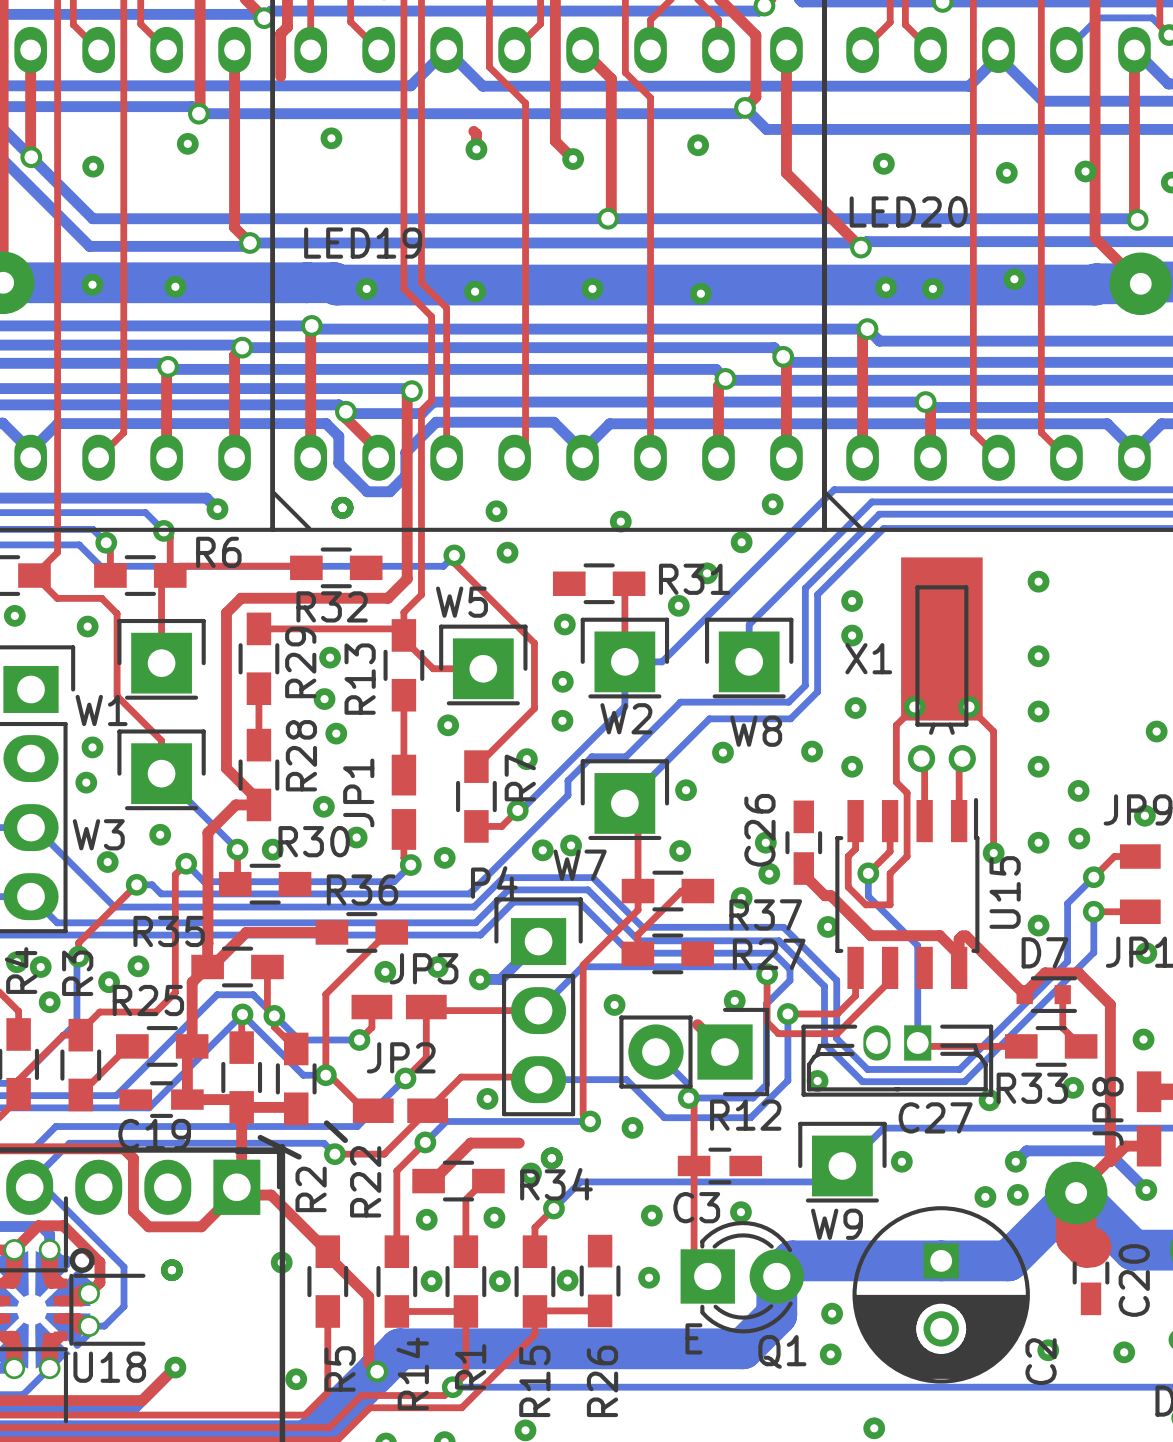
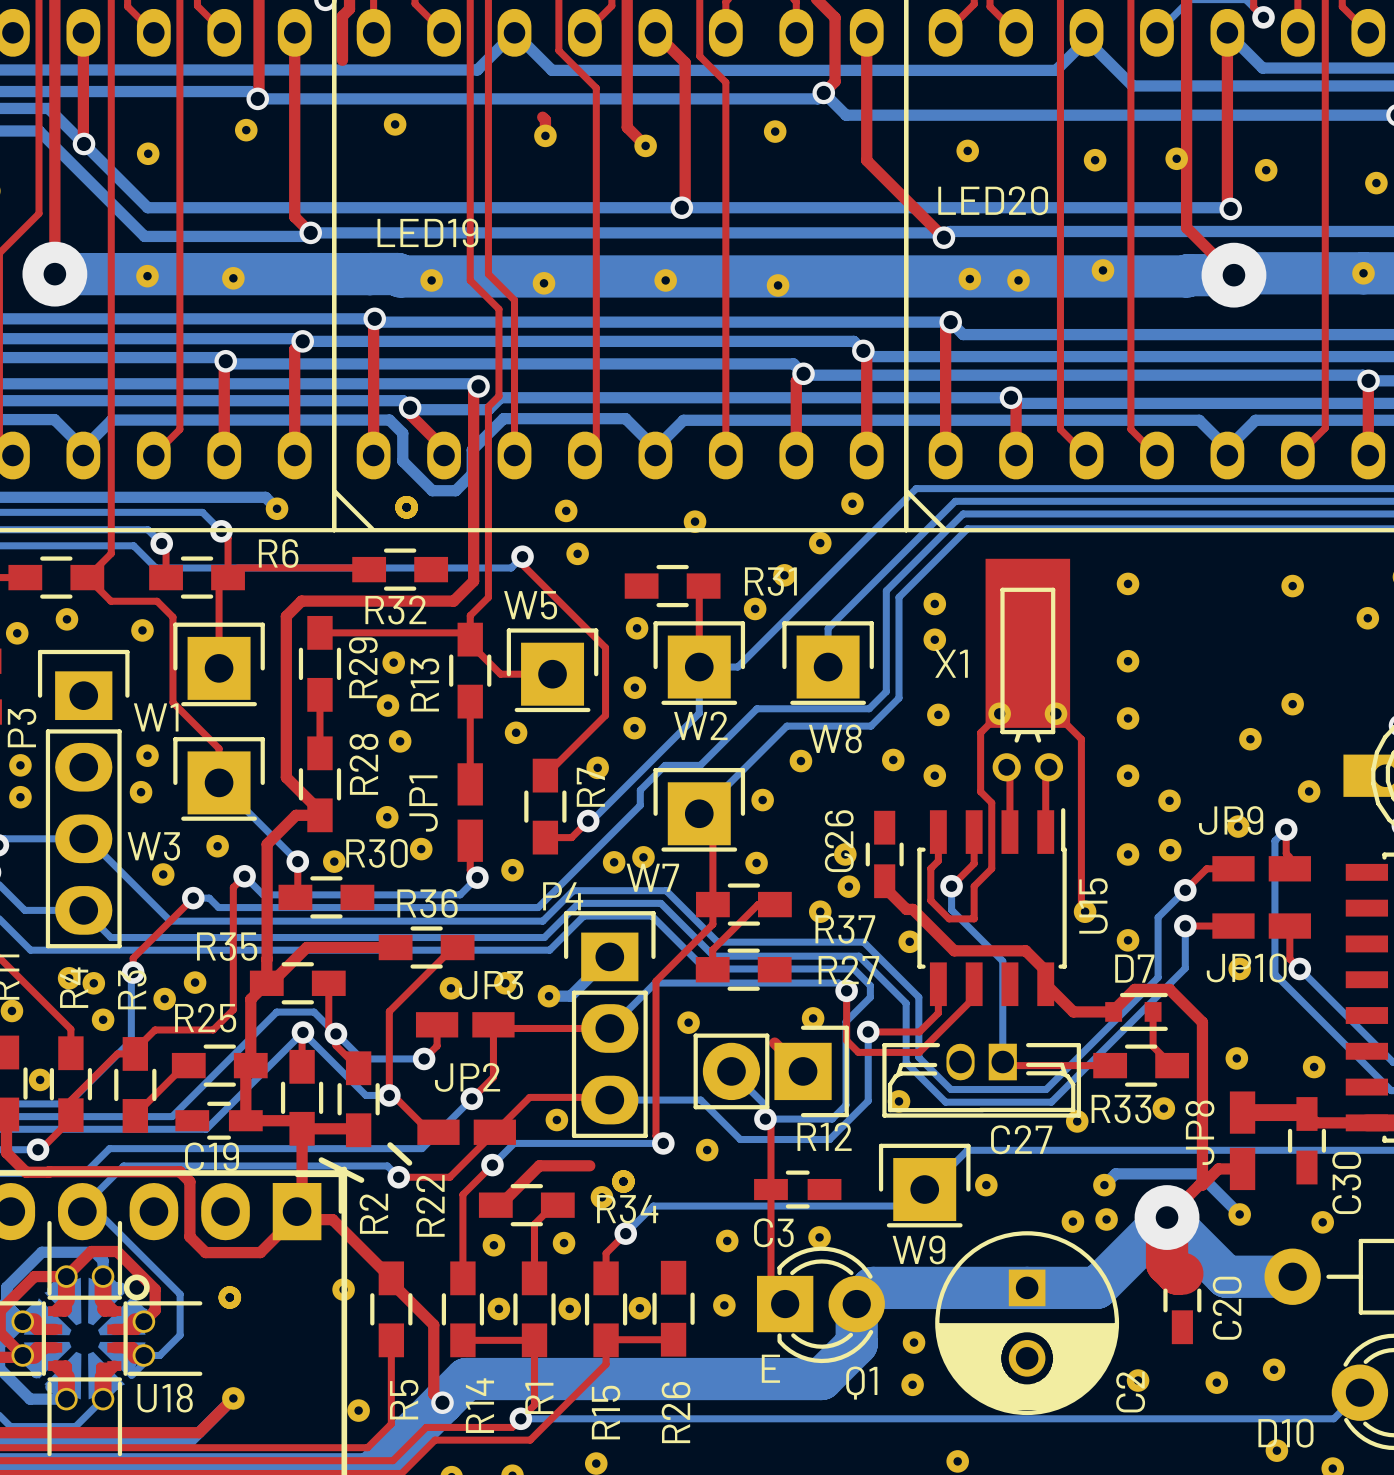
top track: none -> (1081, 865) (1081, 908) (1085, 911)
part position: (993, 853) -> (1085, 911)
top track: (959, 954) (959, 939) (962, 935) (966, 935) (1024, 994) -> (1045, 984) (1073, 1011) (1113, 1011)

